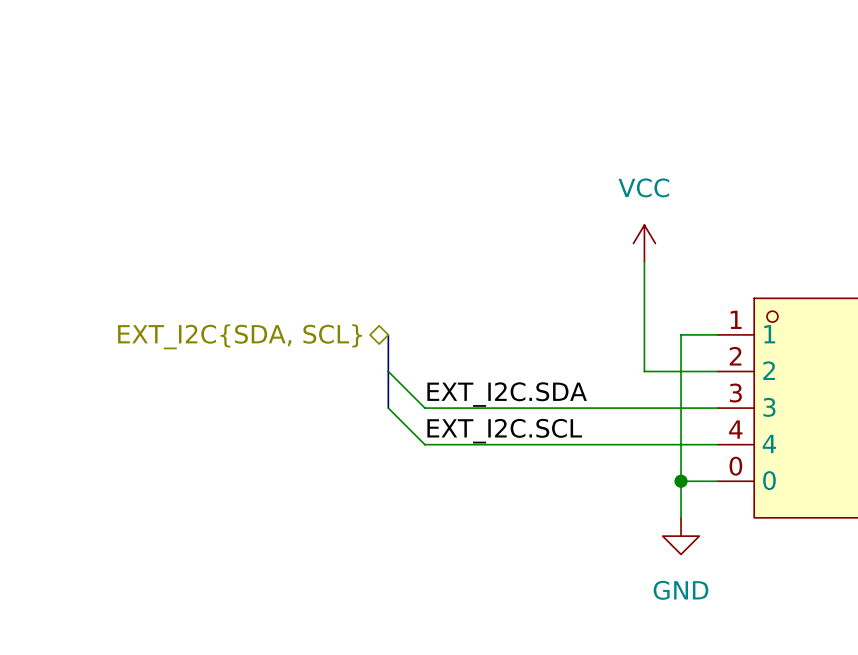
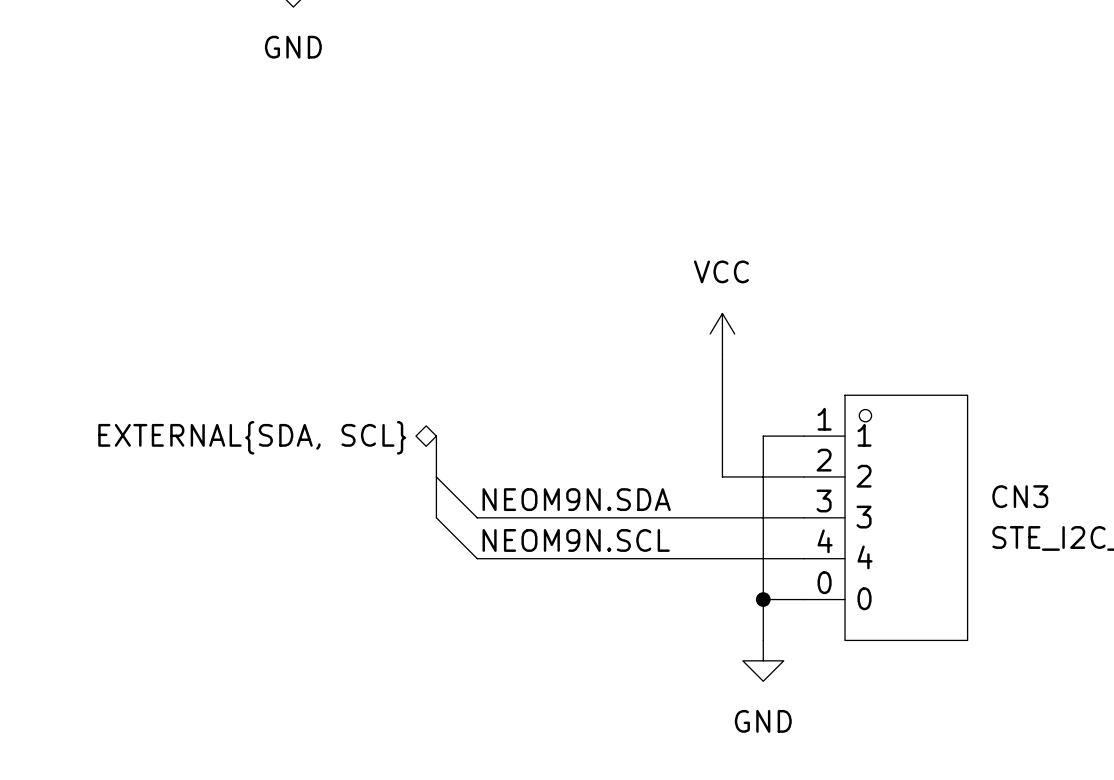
hierarchical label: EXT_I2C{SDA, SCL} (240, 336) -> EXTERNAL{SDA, SCL} (252, 437)
label: EXT_I2C.SDA (507, 394) -> NEOM9N.SDA (576, 499)
label: EXT_I2C.SCL (504, 431) -> NEOM9N.SCL (576, 540)

